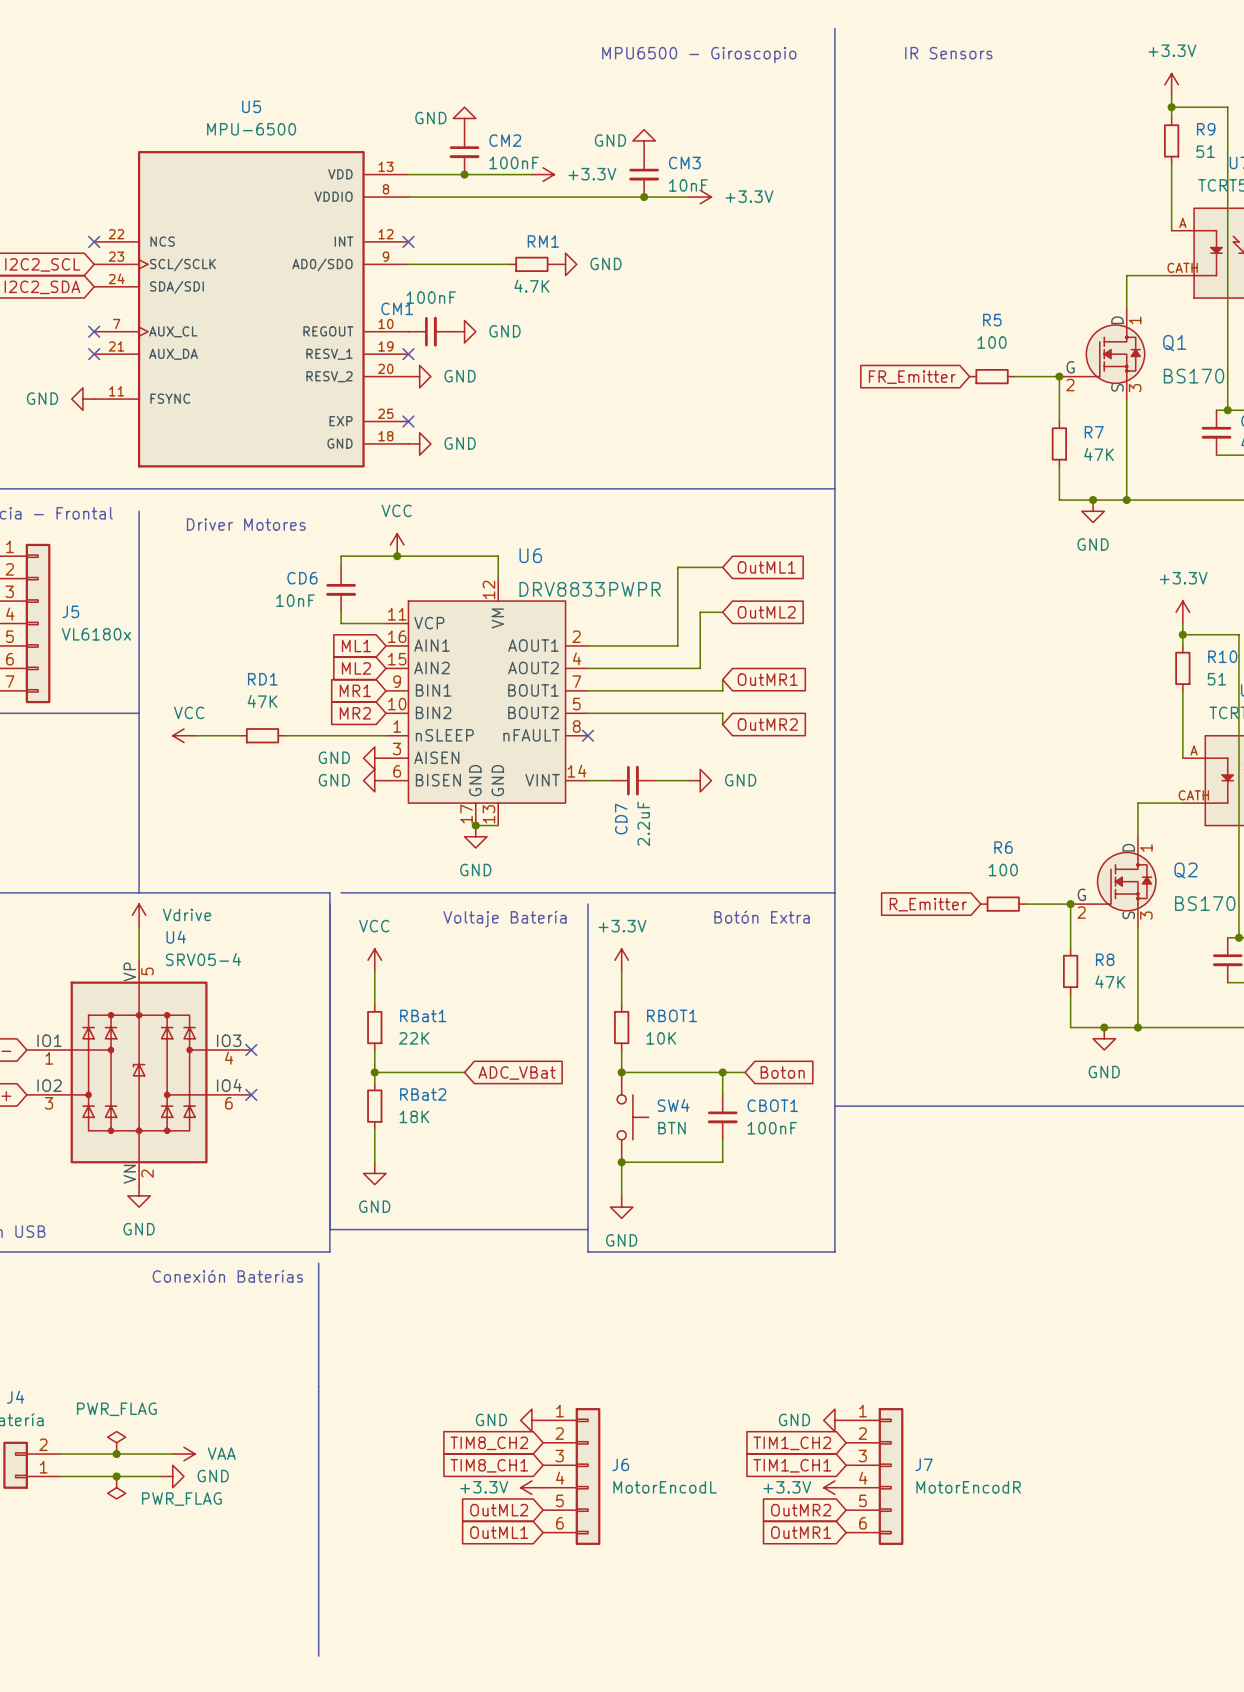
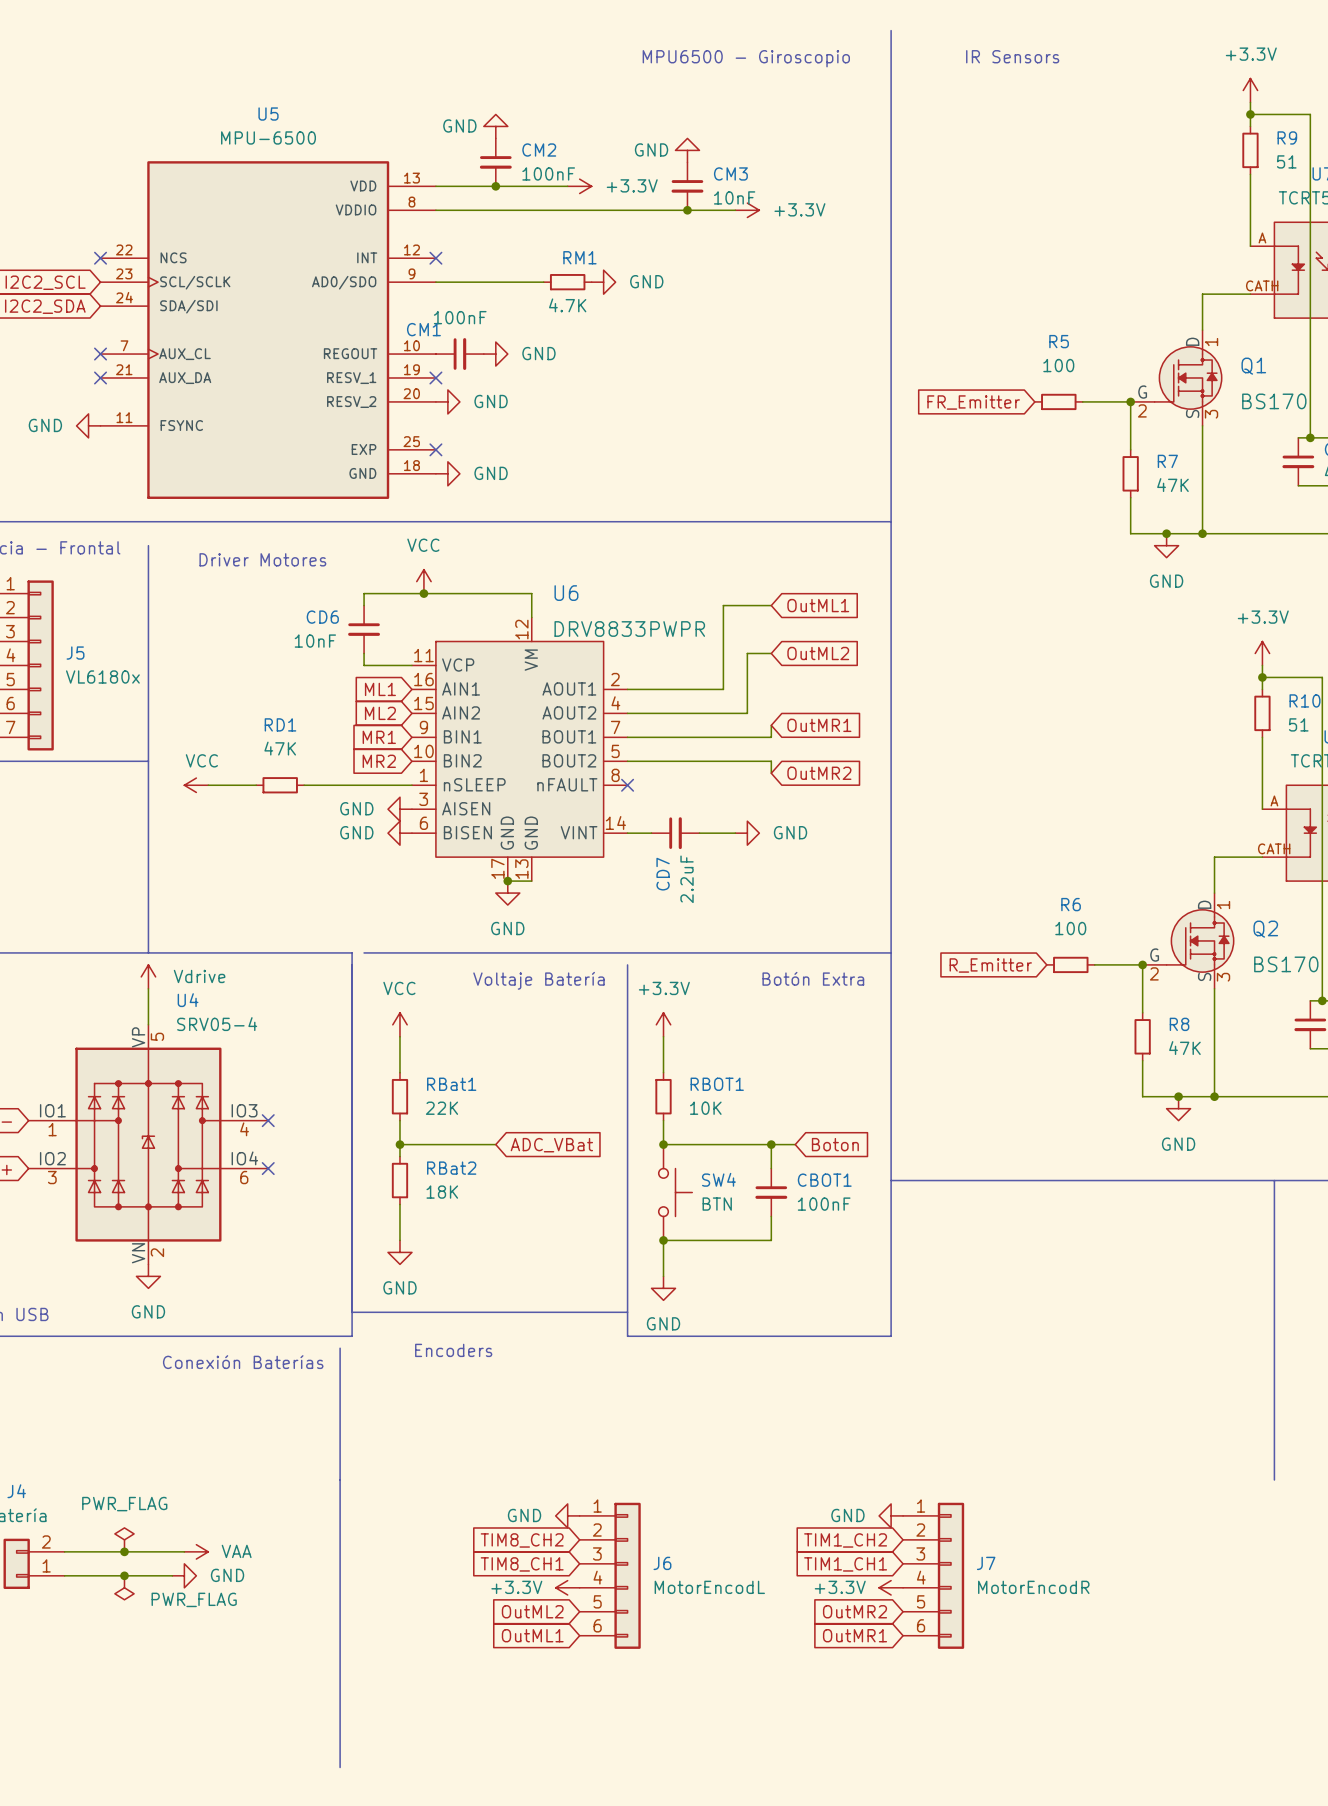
line: none -> (1274, 1180) (1274, 1480)
text: none -> Encoders (453, 1350)

